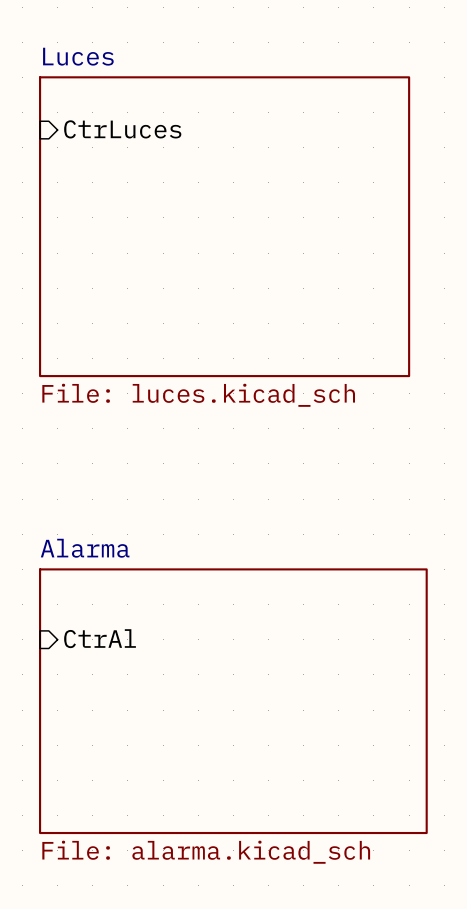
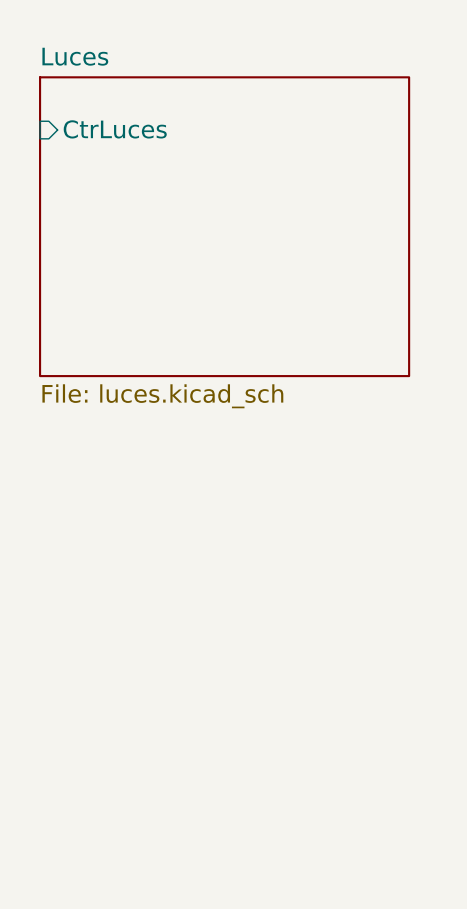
sheet pin: CtrAl (100, 638) -> none
sheet Alarma: File: alarma.kicad_sch (233, 701) -> none

